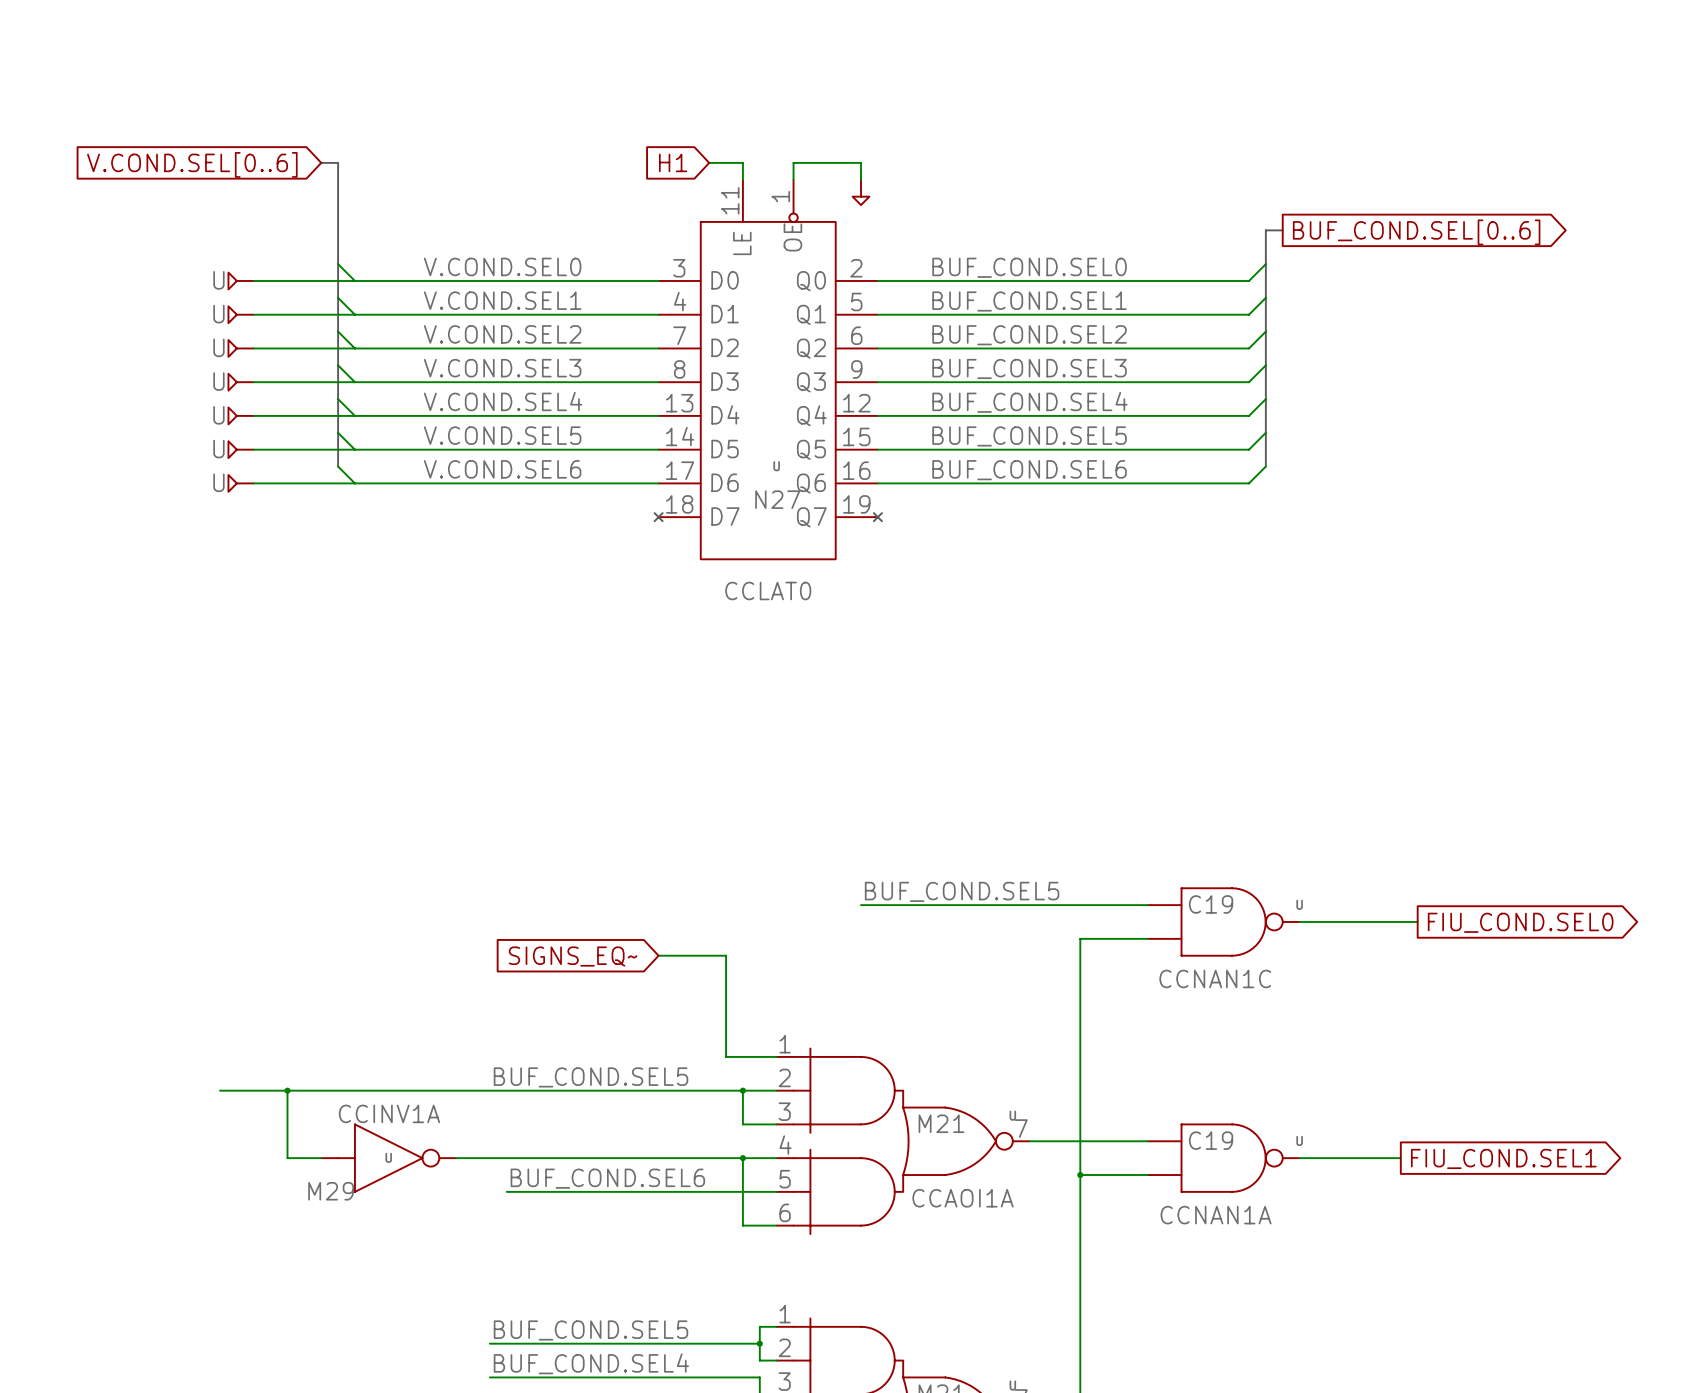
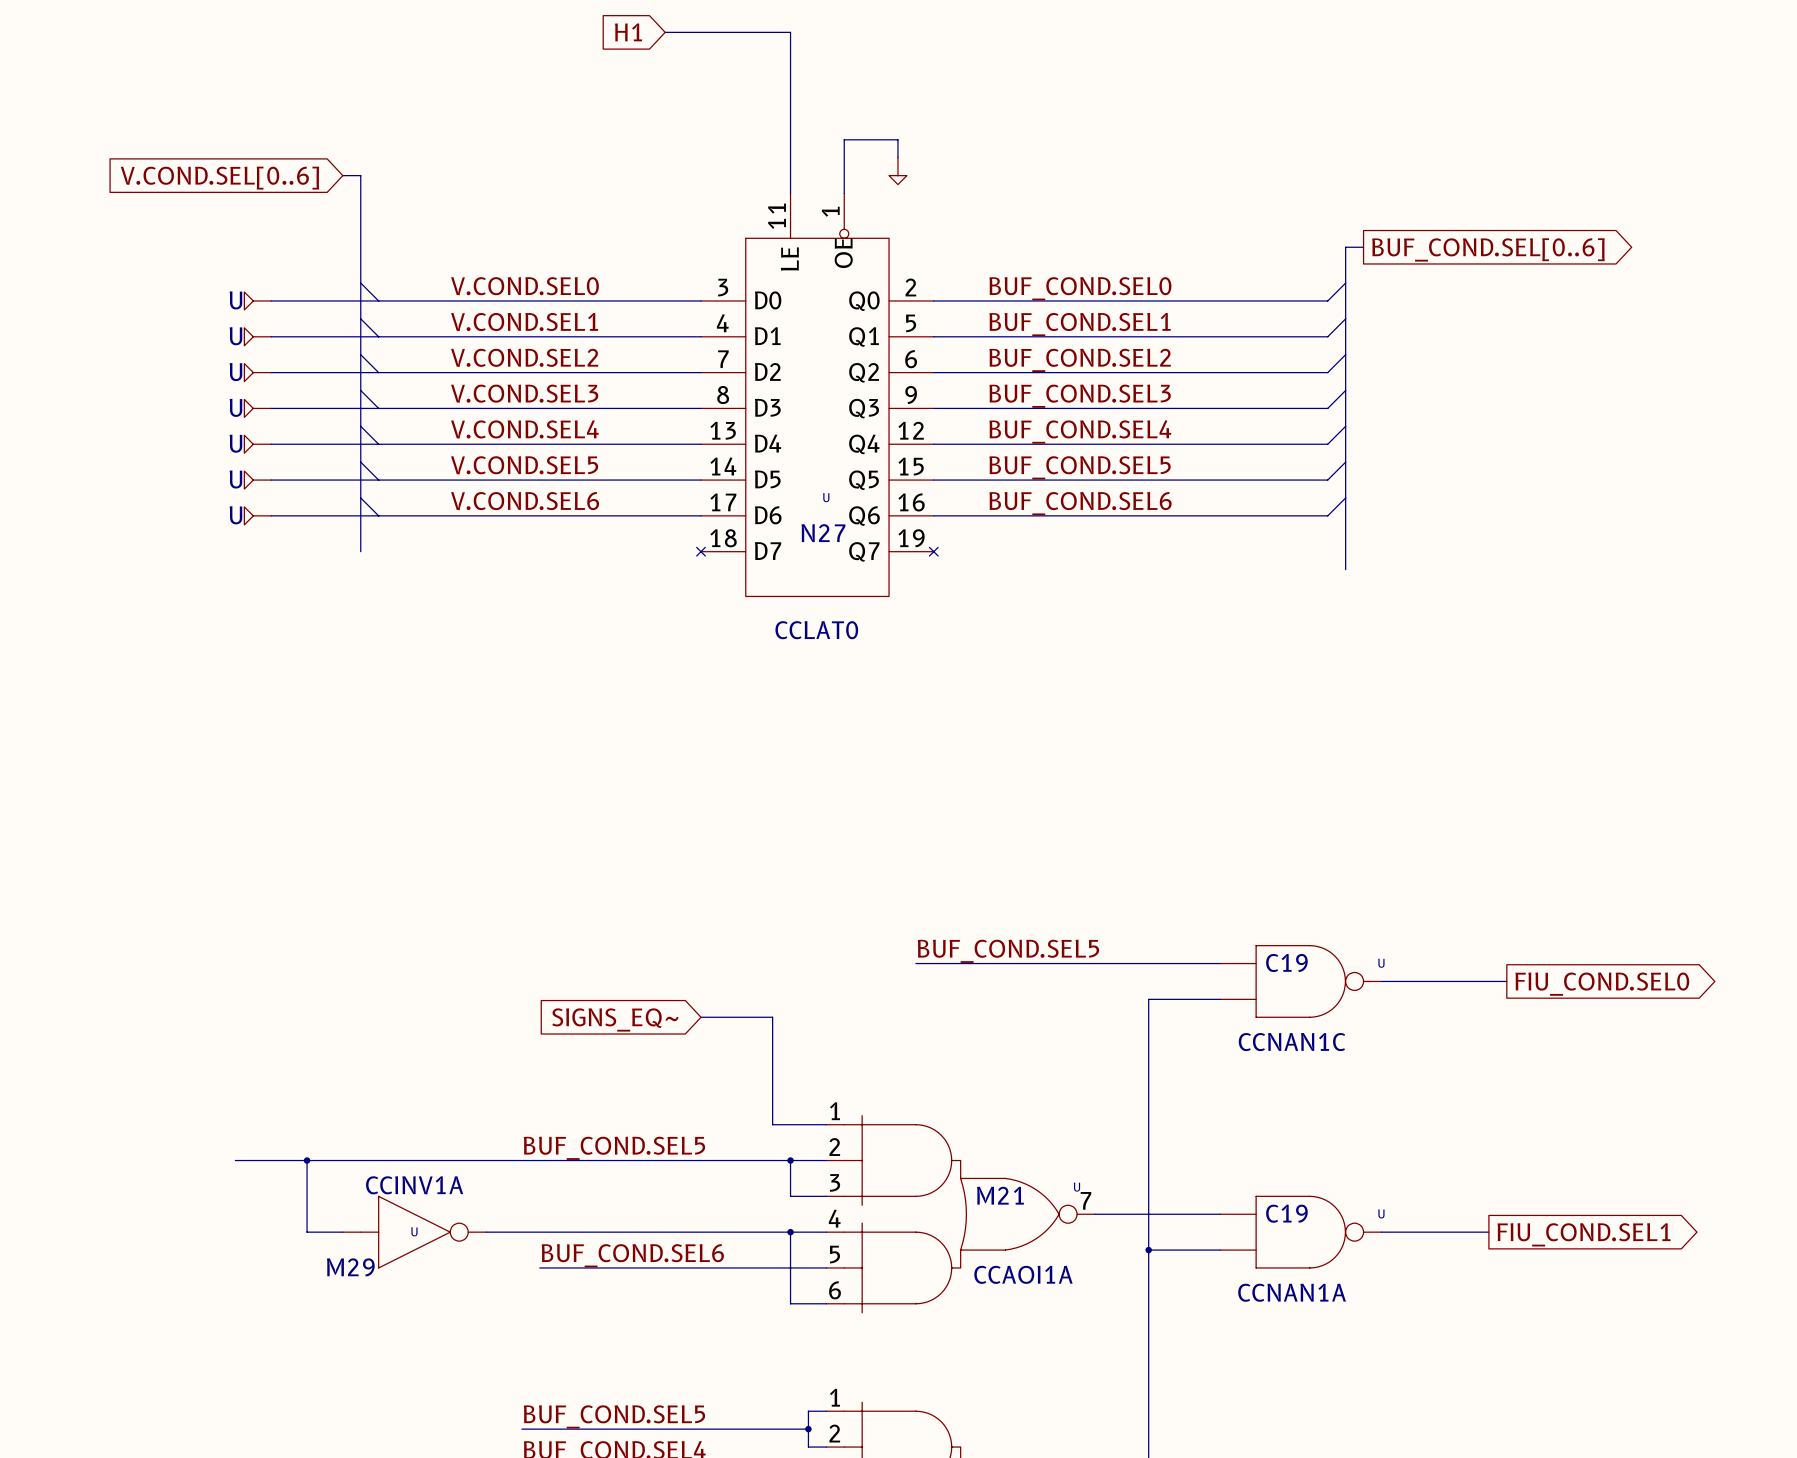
global label position: H1 (673, 162) -> H1 (628, 32)
wire: (709, 162) (742, 162) -> (665, 32) (790, 32) (790, 175)
wire: (793, 162) (861, 162) (861, 179) -> (844, 175) (844, 139) (897, 139) (897, 157)
power symbol position: (861, 192) -> (897, 171)
bus: none -> (360, 497) (360, 551)
bus: none -> (1345, 497) (1345, 569)

